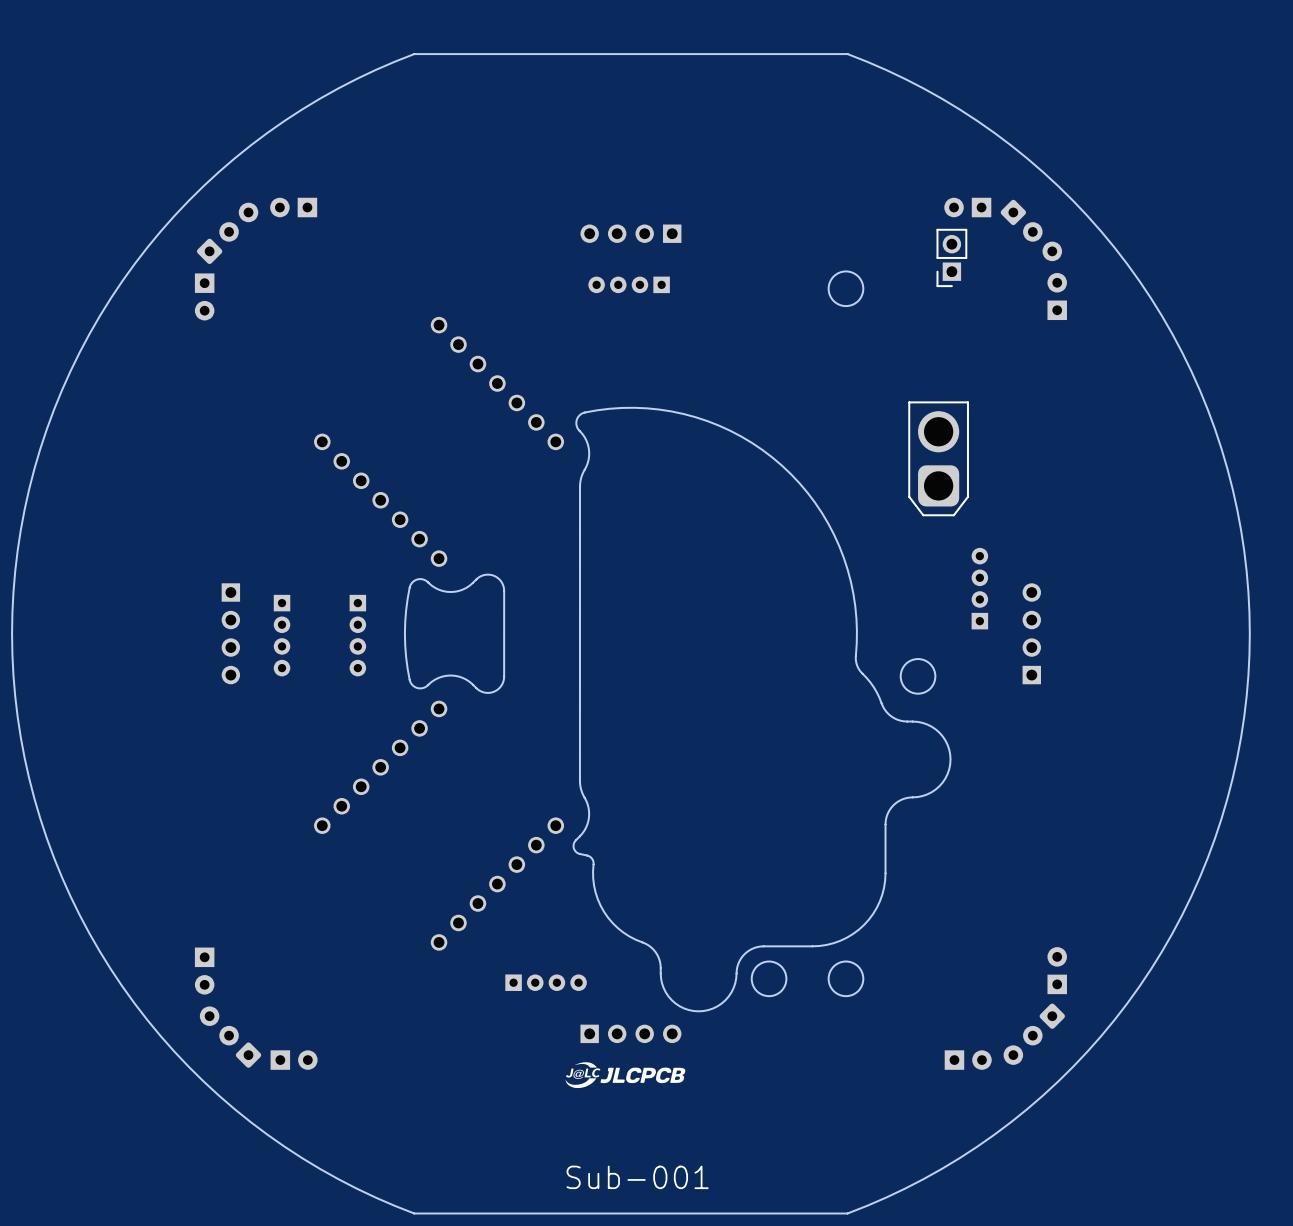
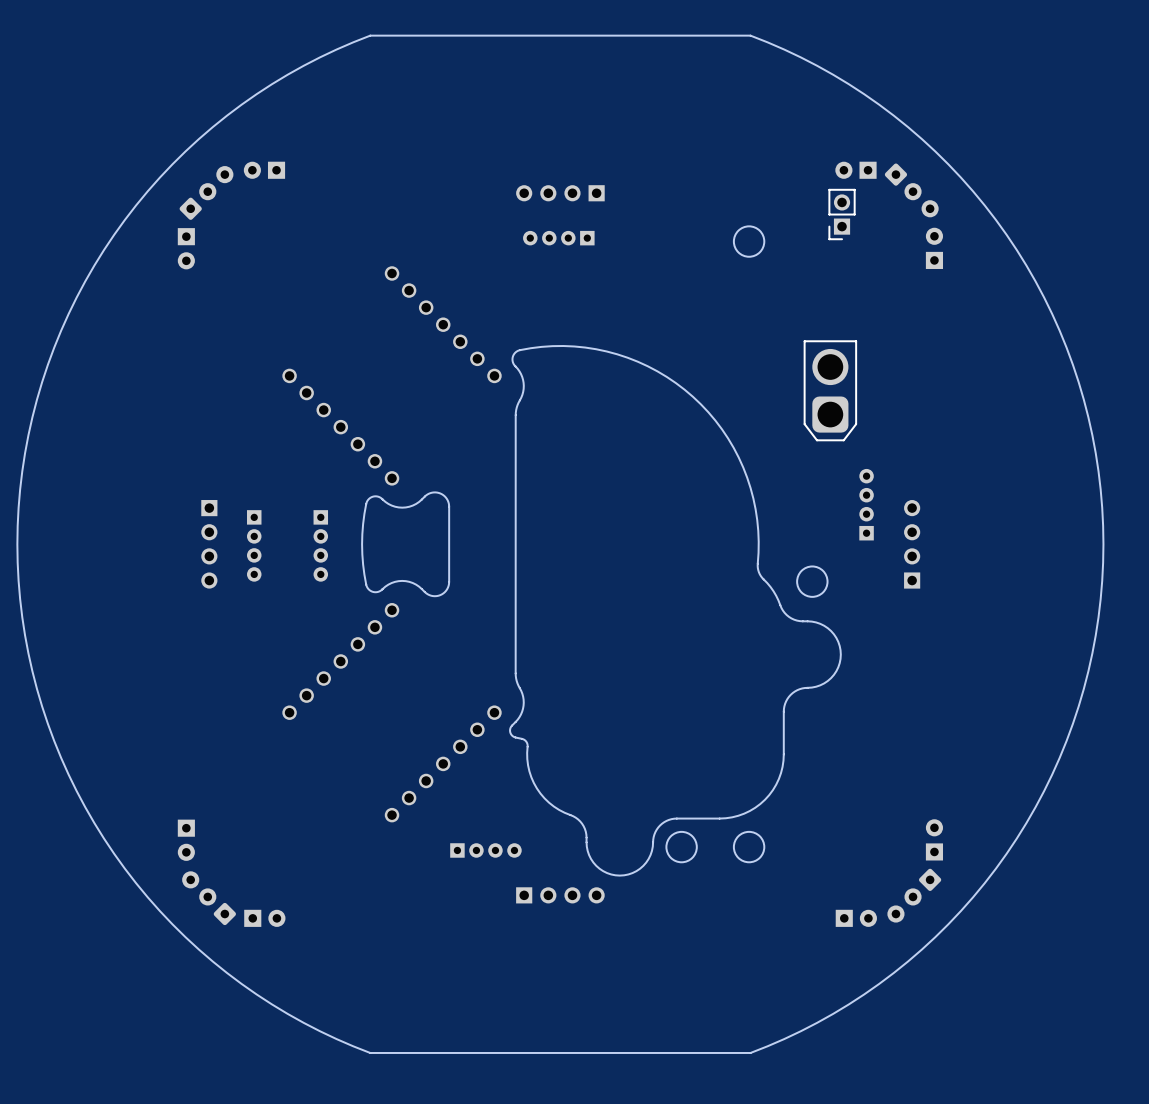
drawing: [565, 1062, 686, 1089] -> none
text: Sub-001 (637, 1177) -> none

